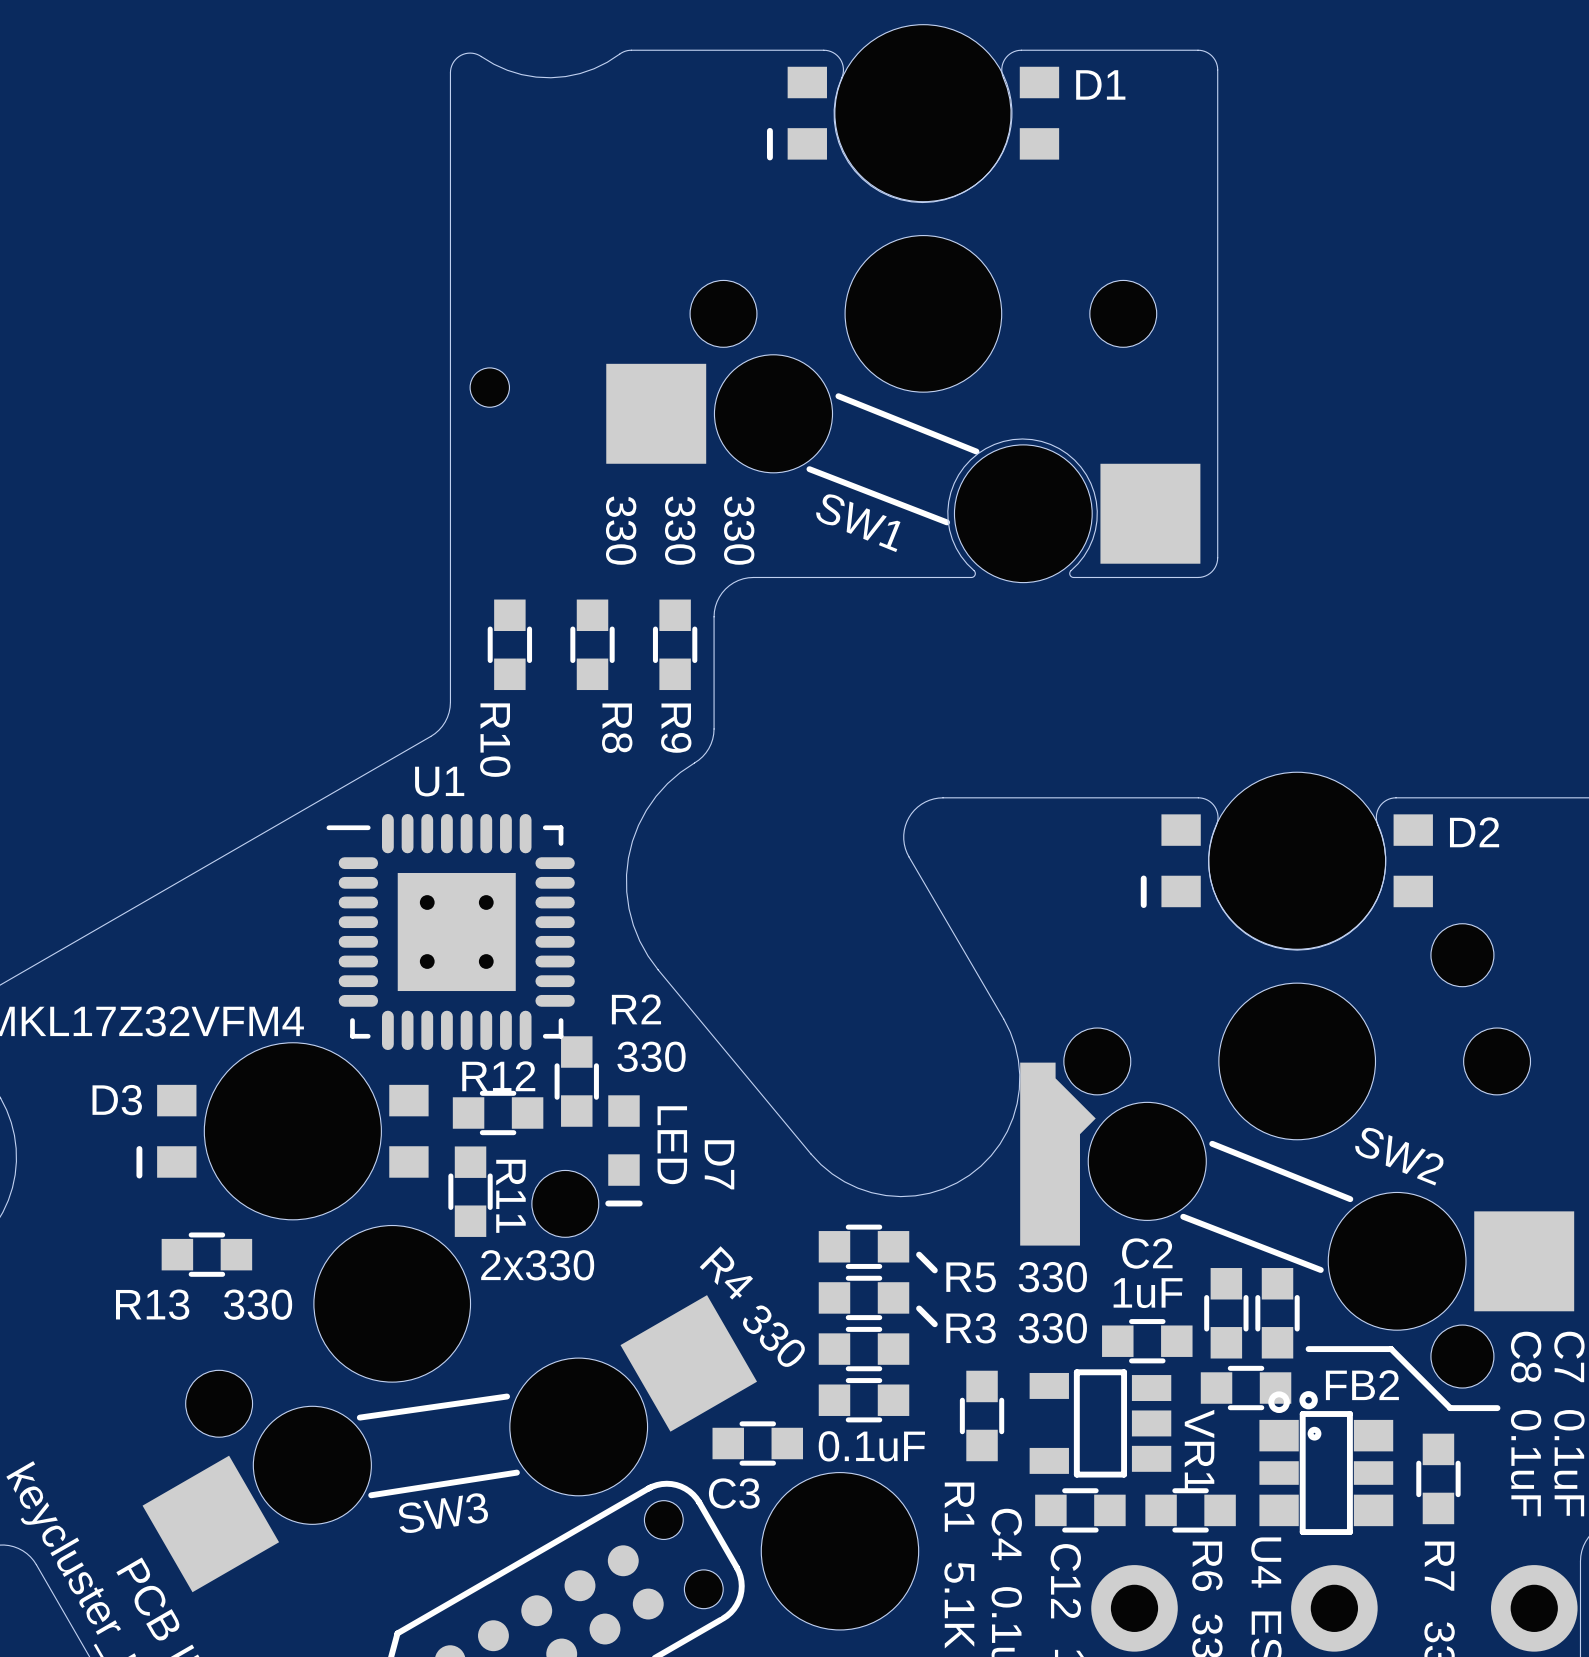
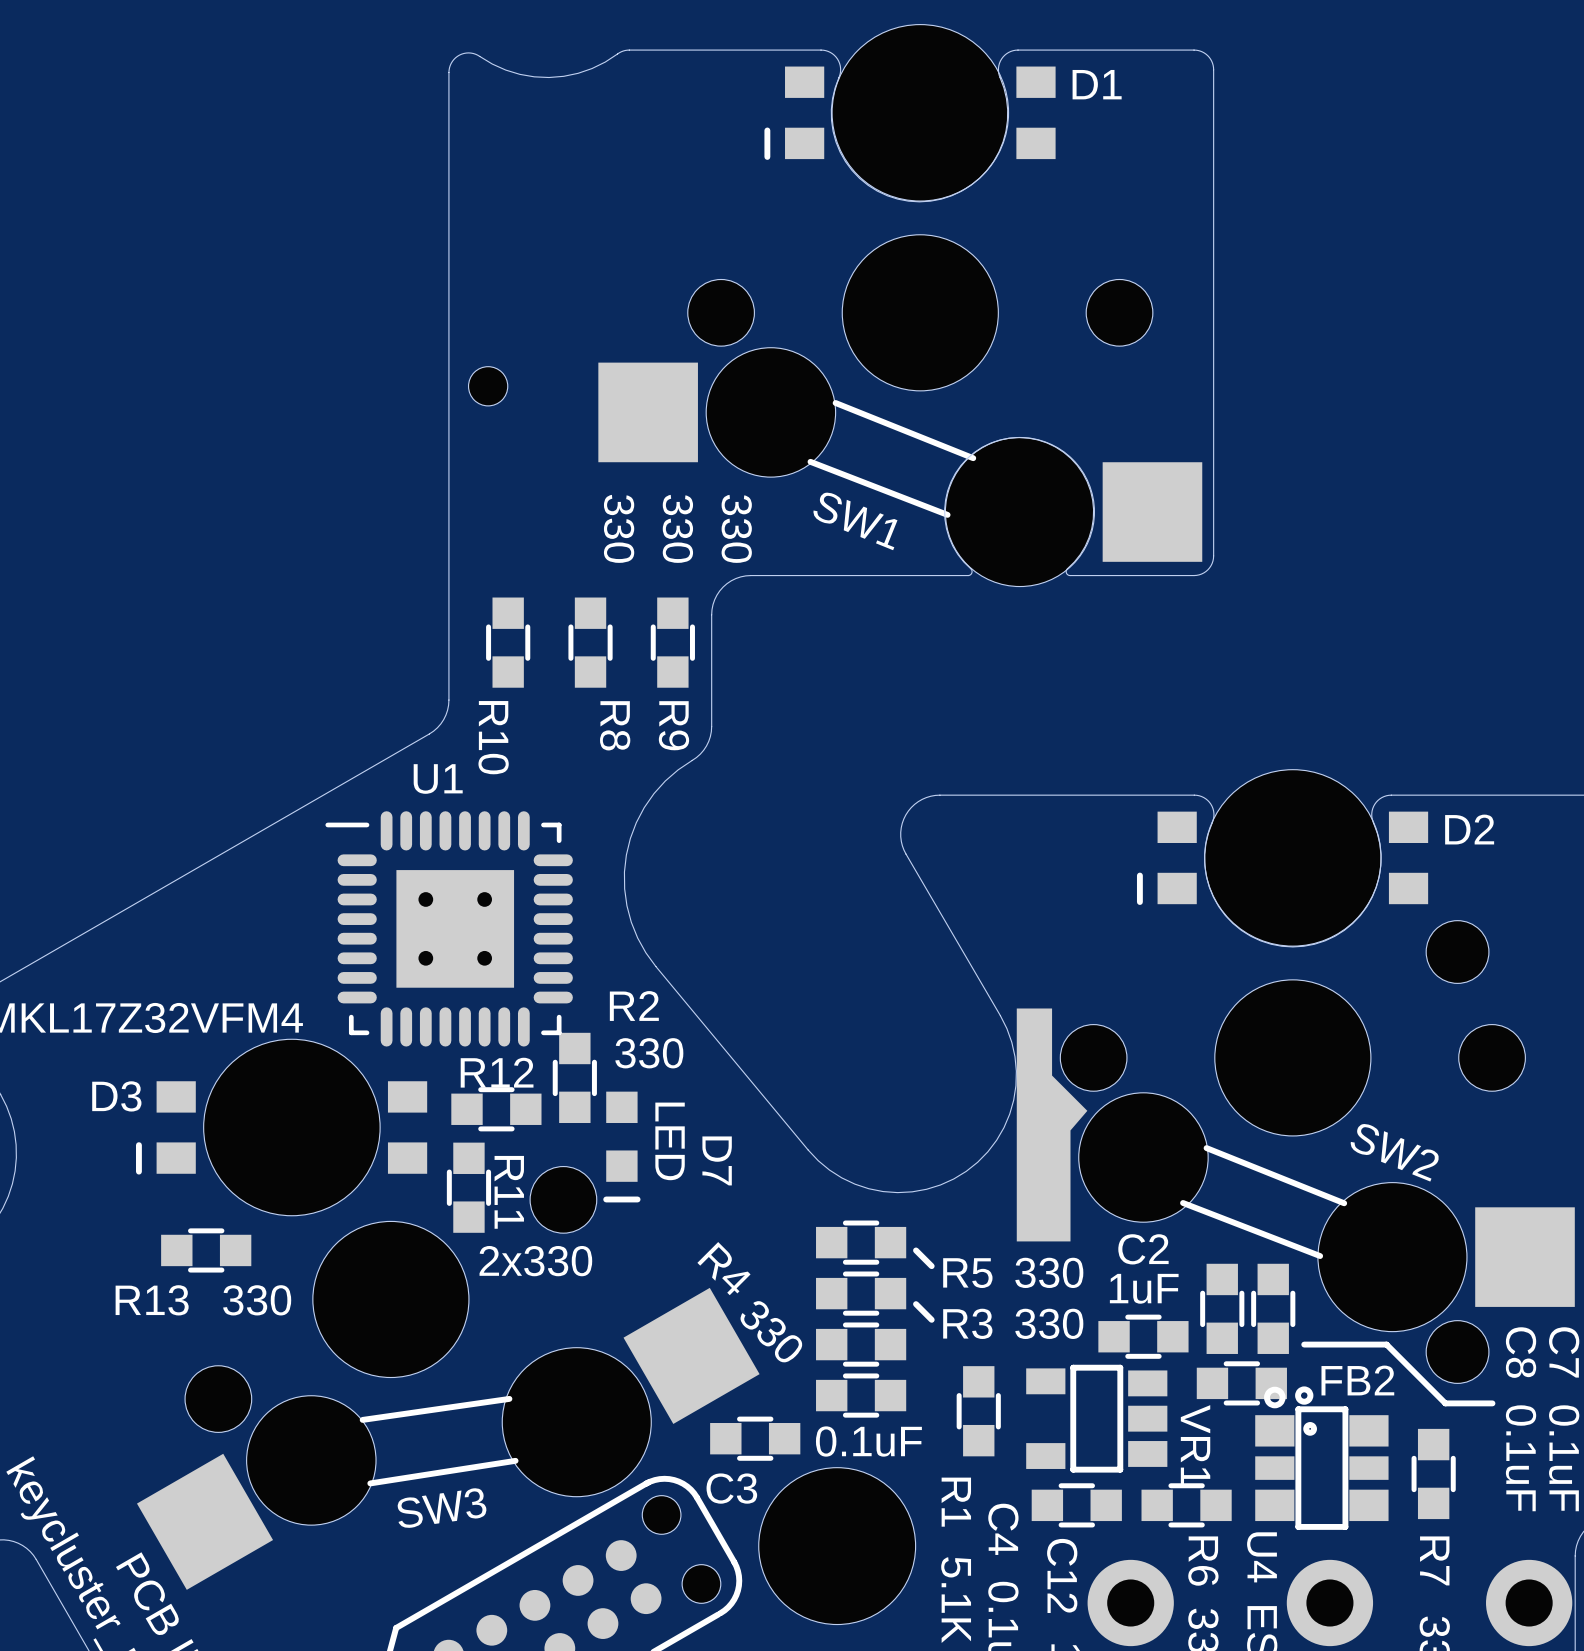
SW1 footprint: [606, 235, 1201, 583] -> [598, 234, 1203, 587]
SW2 footprint: [1020, 983, 1575, 1331] -> [1016, 979, 1575, 1332]
SW3 footprint: [142, 1170, 758, 1593] -> [136, 1166, 760, 1590]

